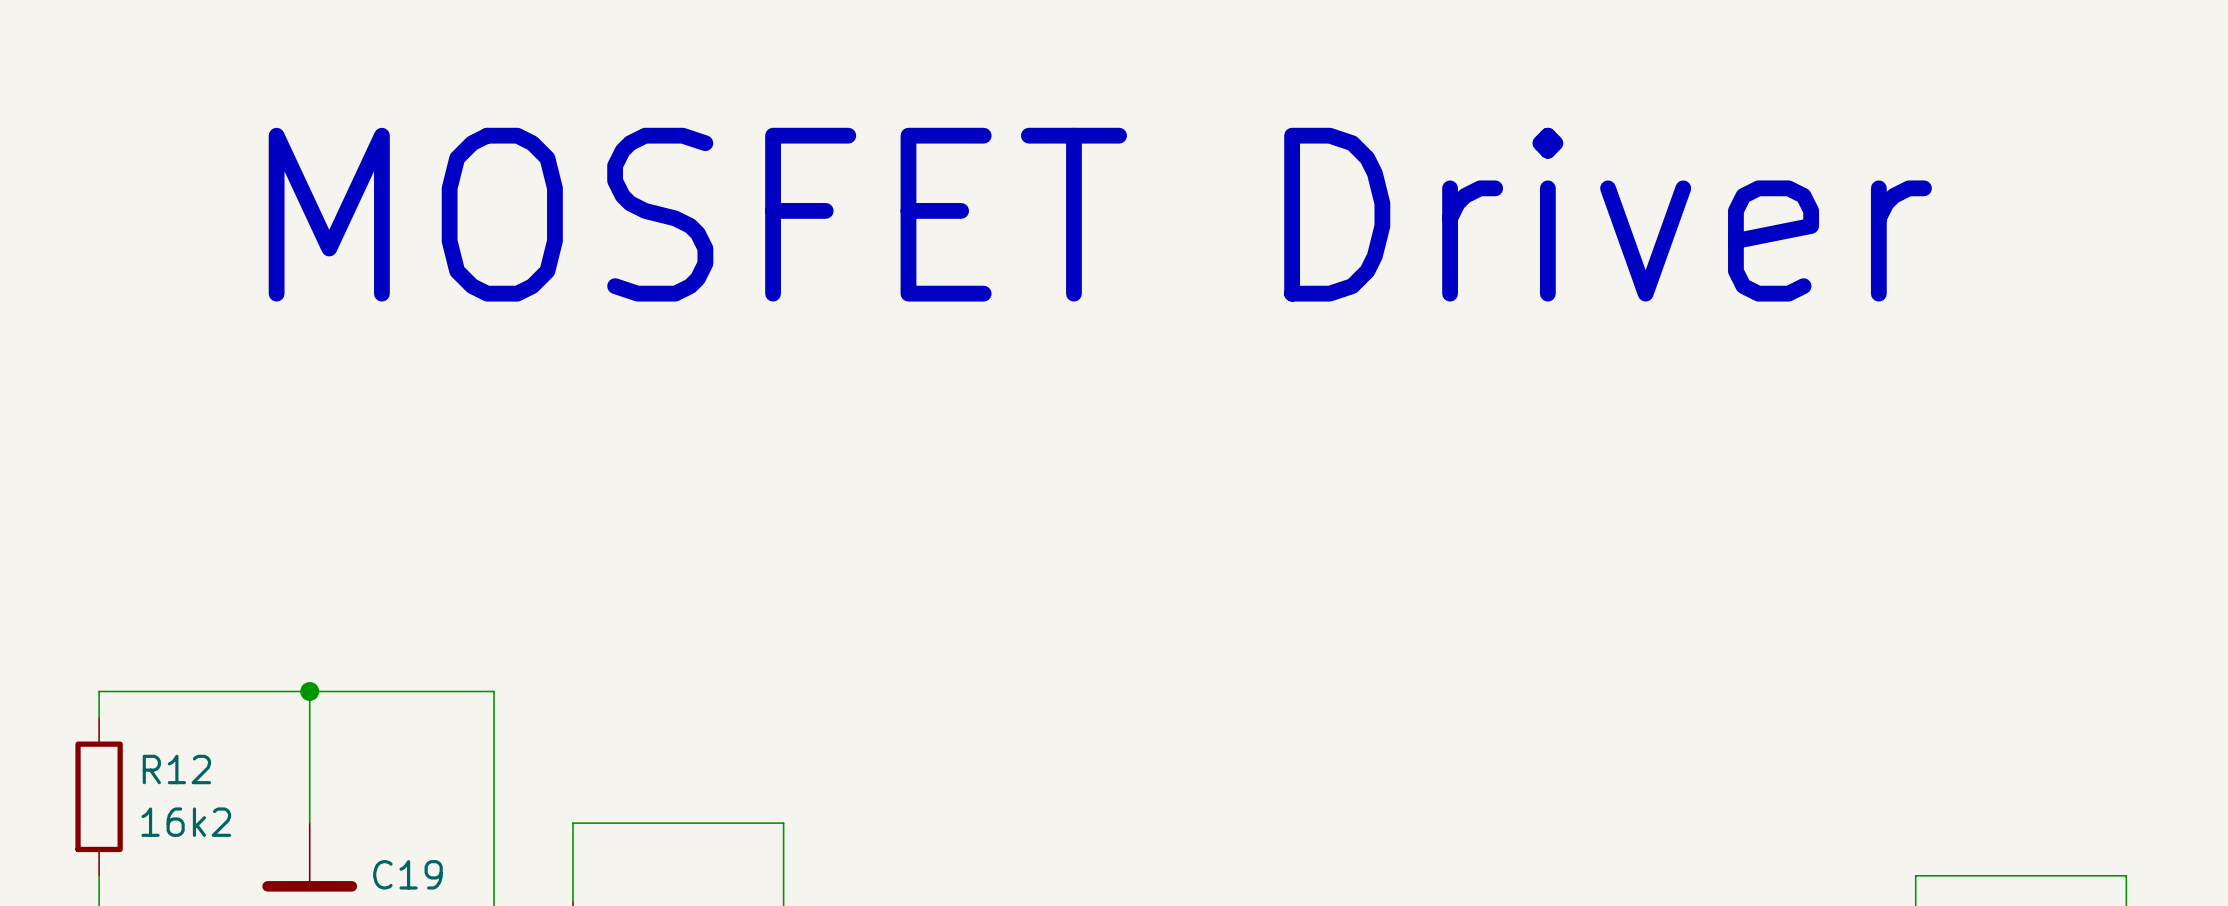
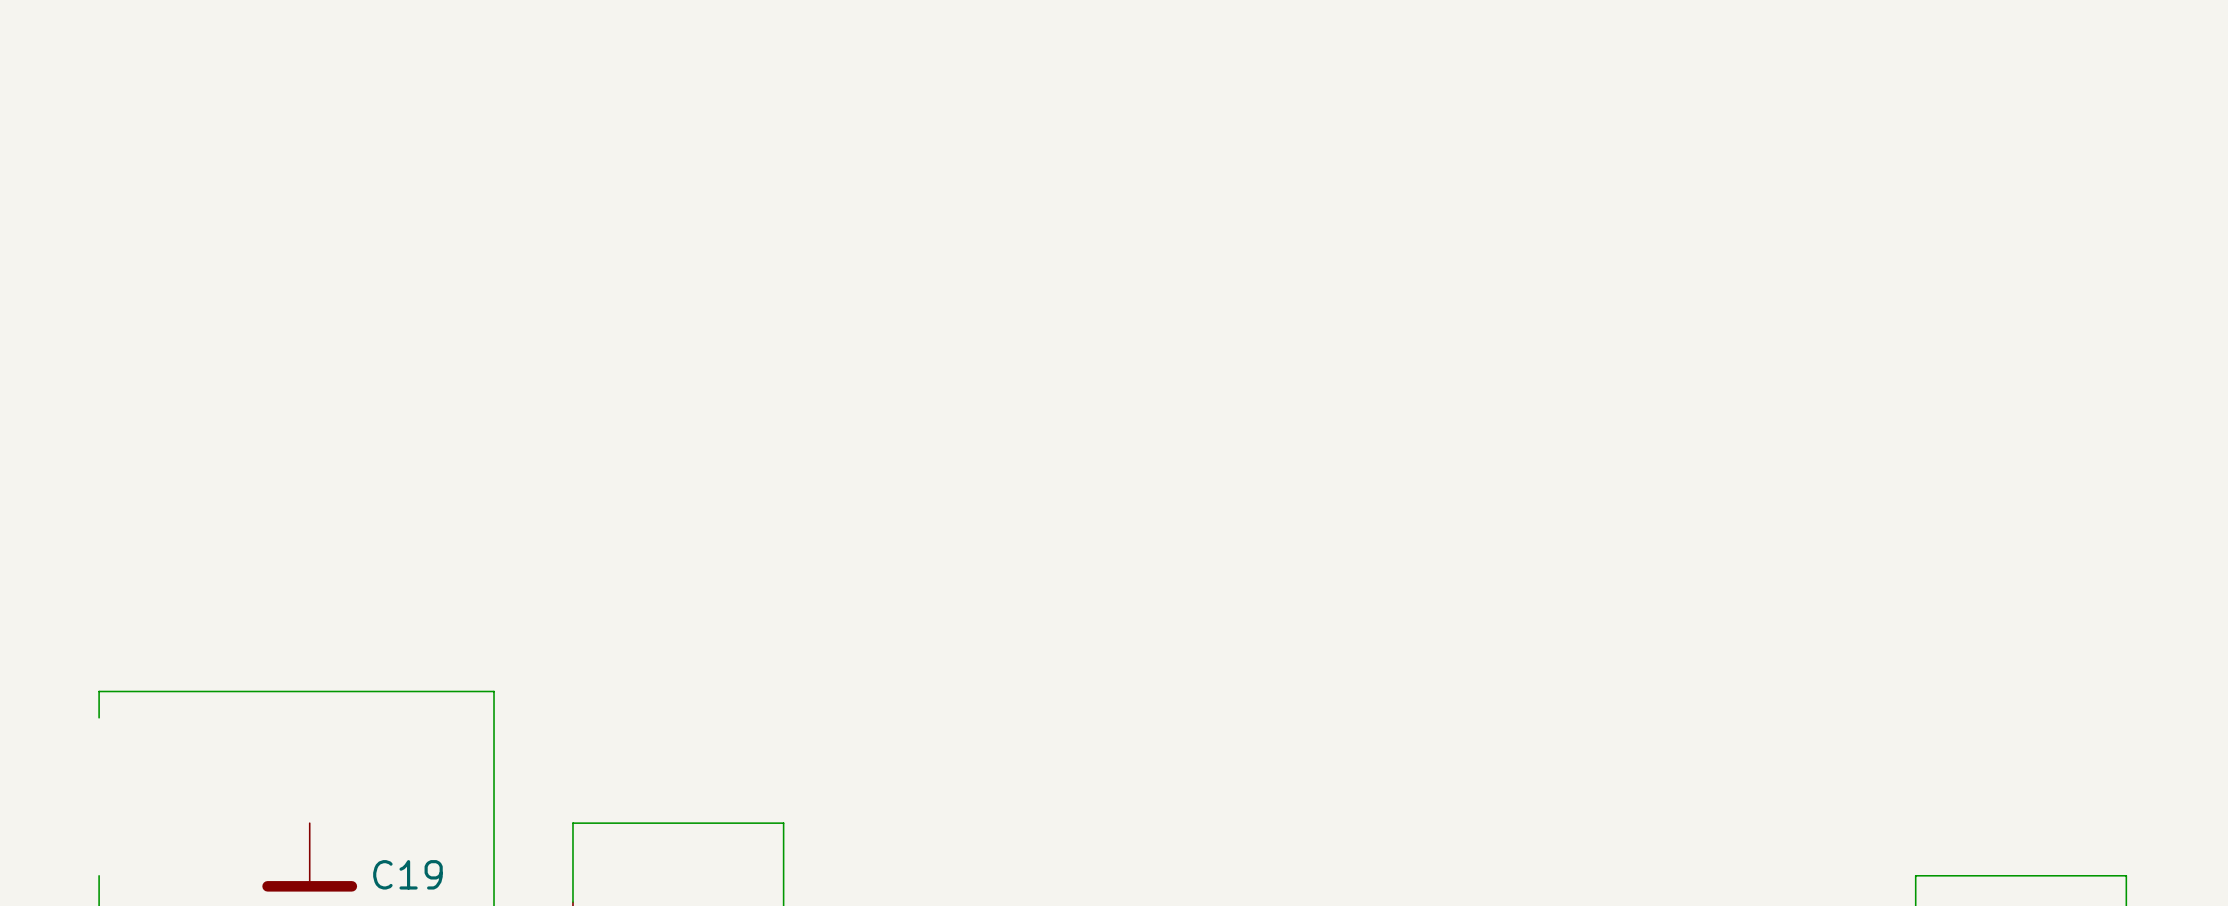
text: MOSFET Driver (1100, 214) -> none
wire: (309, 691) (309, 823) -> none
junction: (309, 691) -> none
R12: 16k2 (99, 796) -> none

